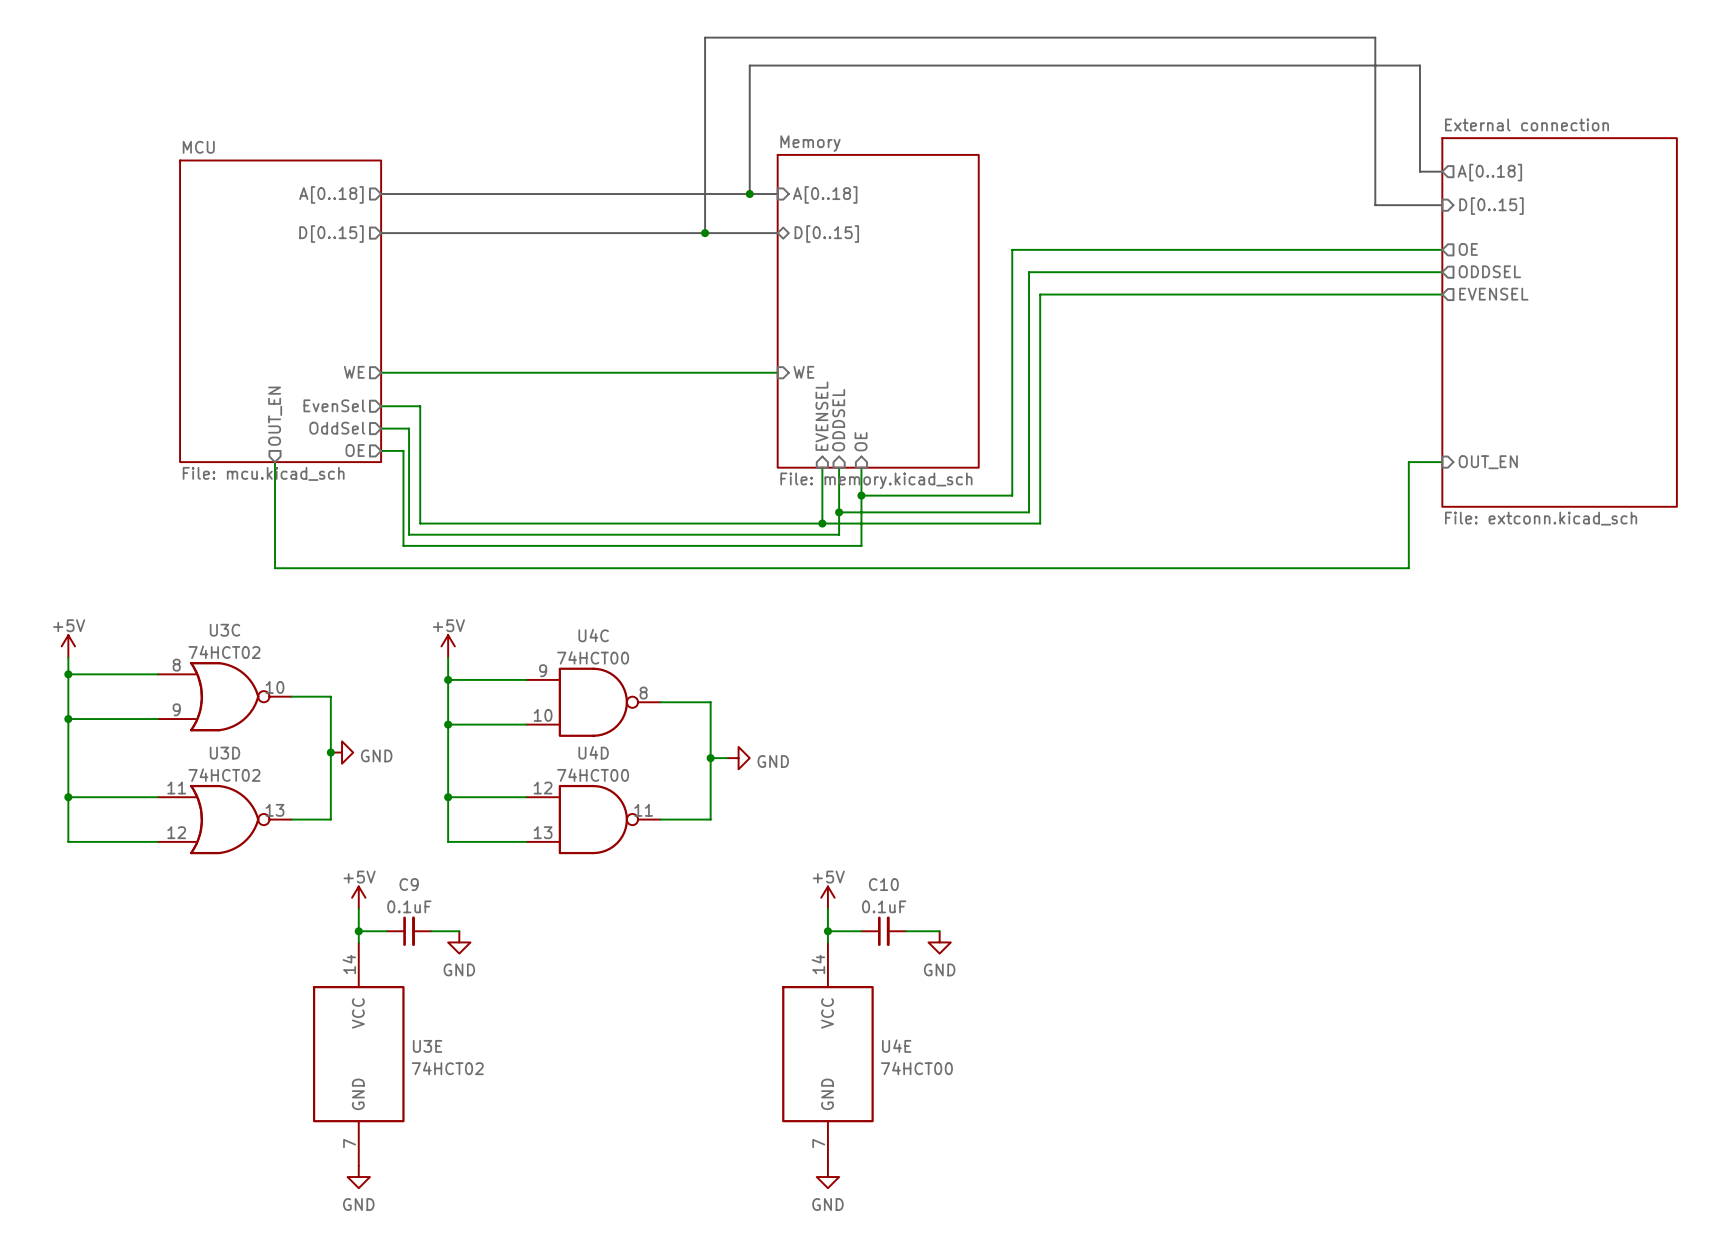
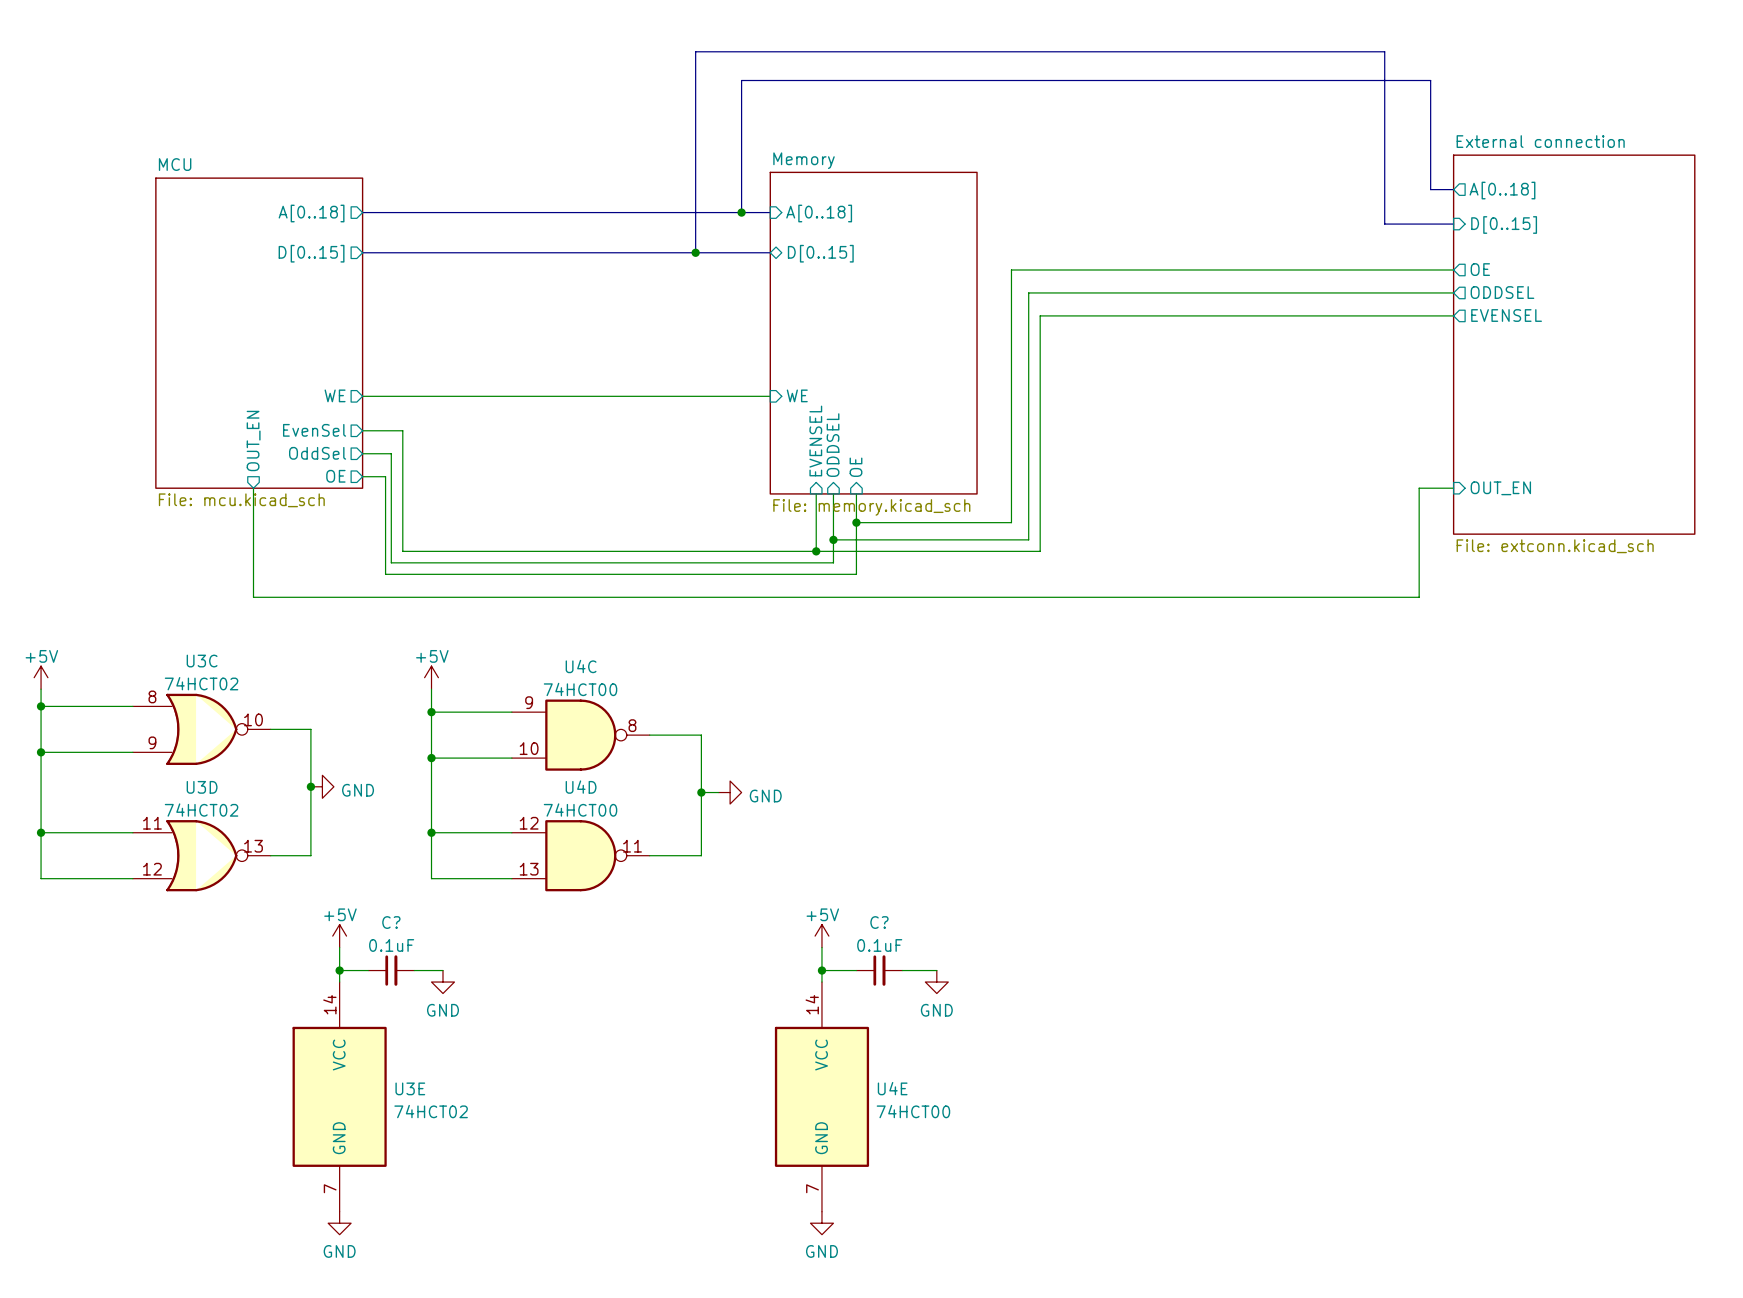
C9 name: C9 (409, 884) -> C? (391, 922)
C10 name: C10 (883, 884) -> C? (879, 922)

